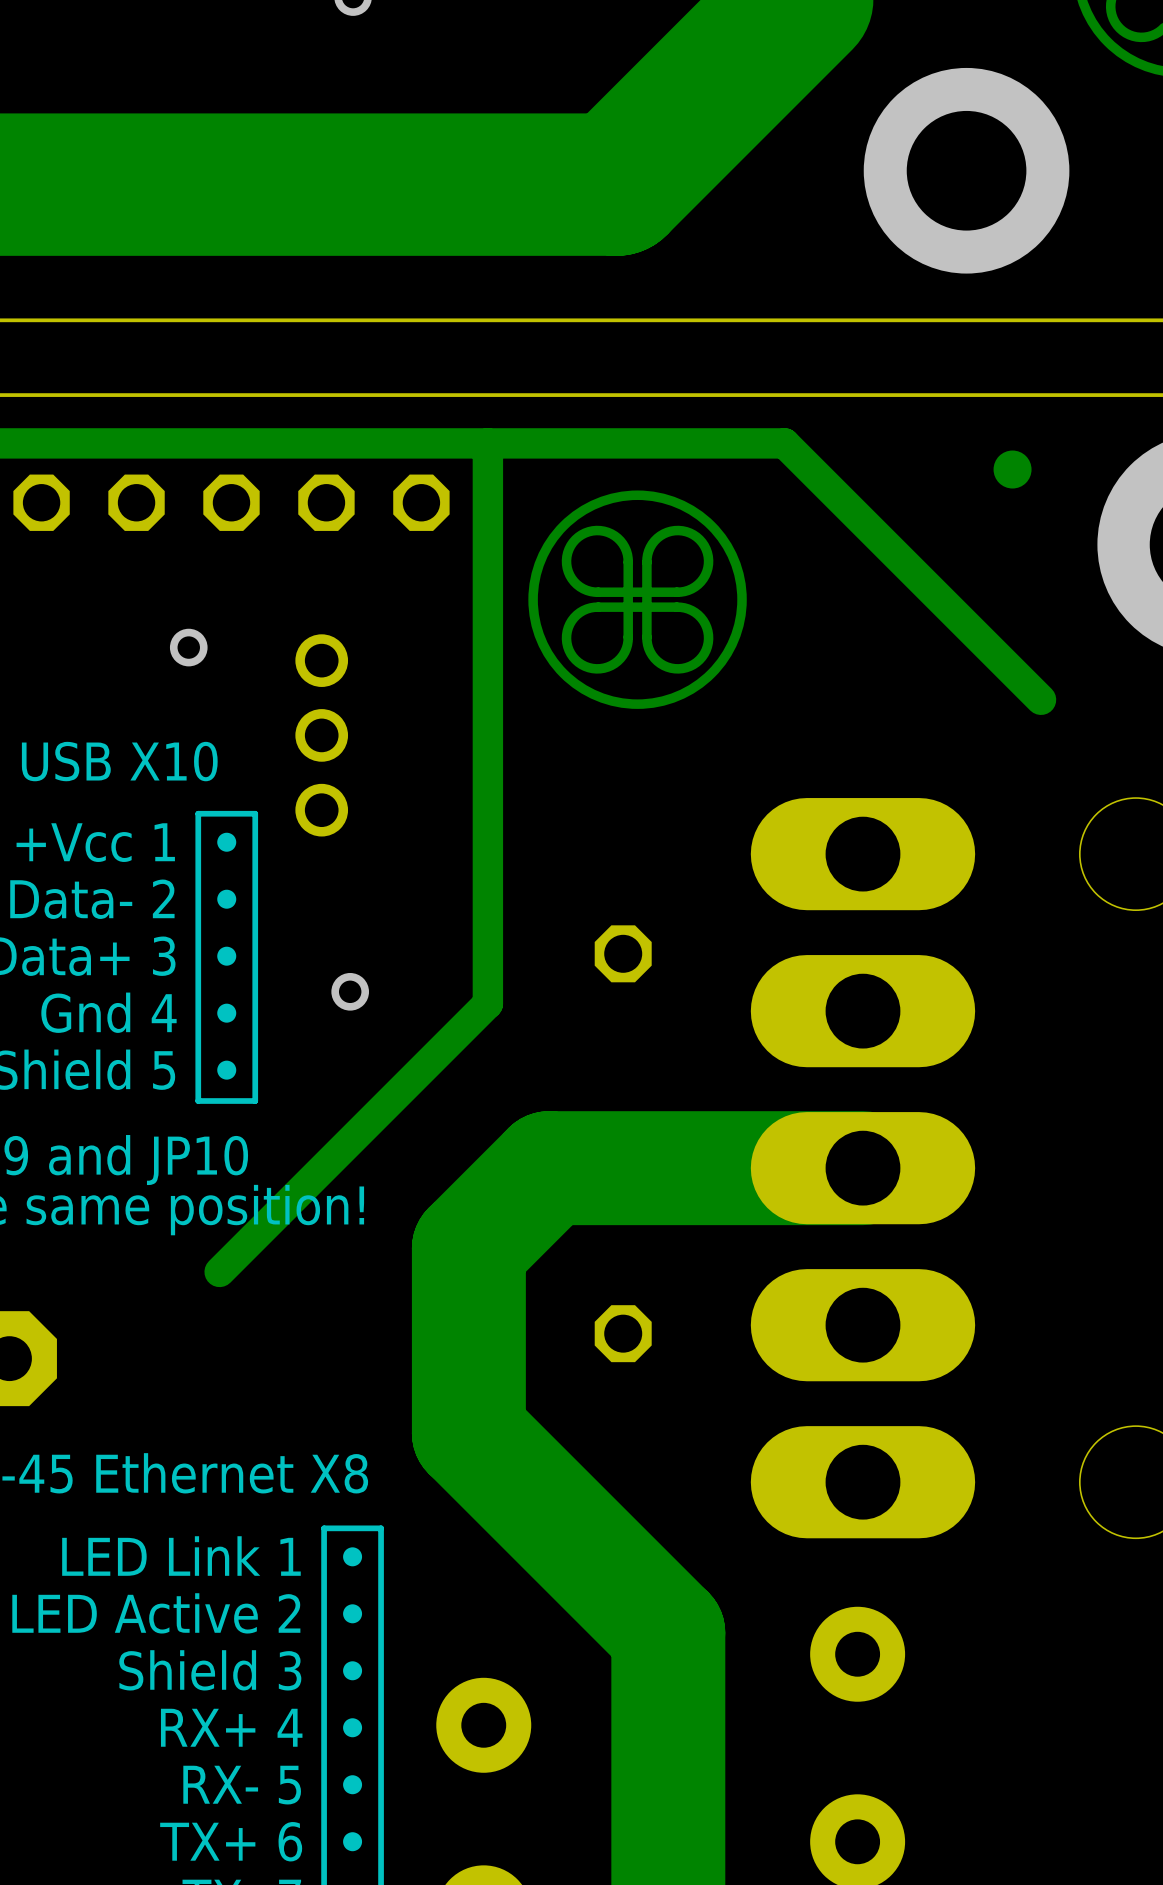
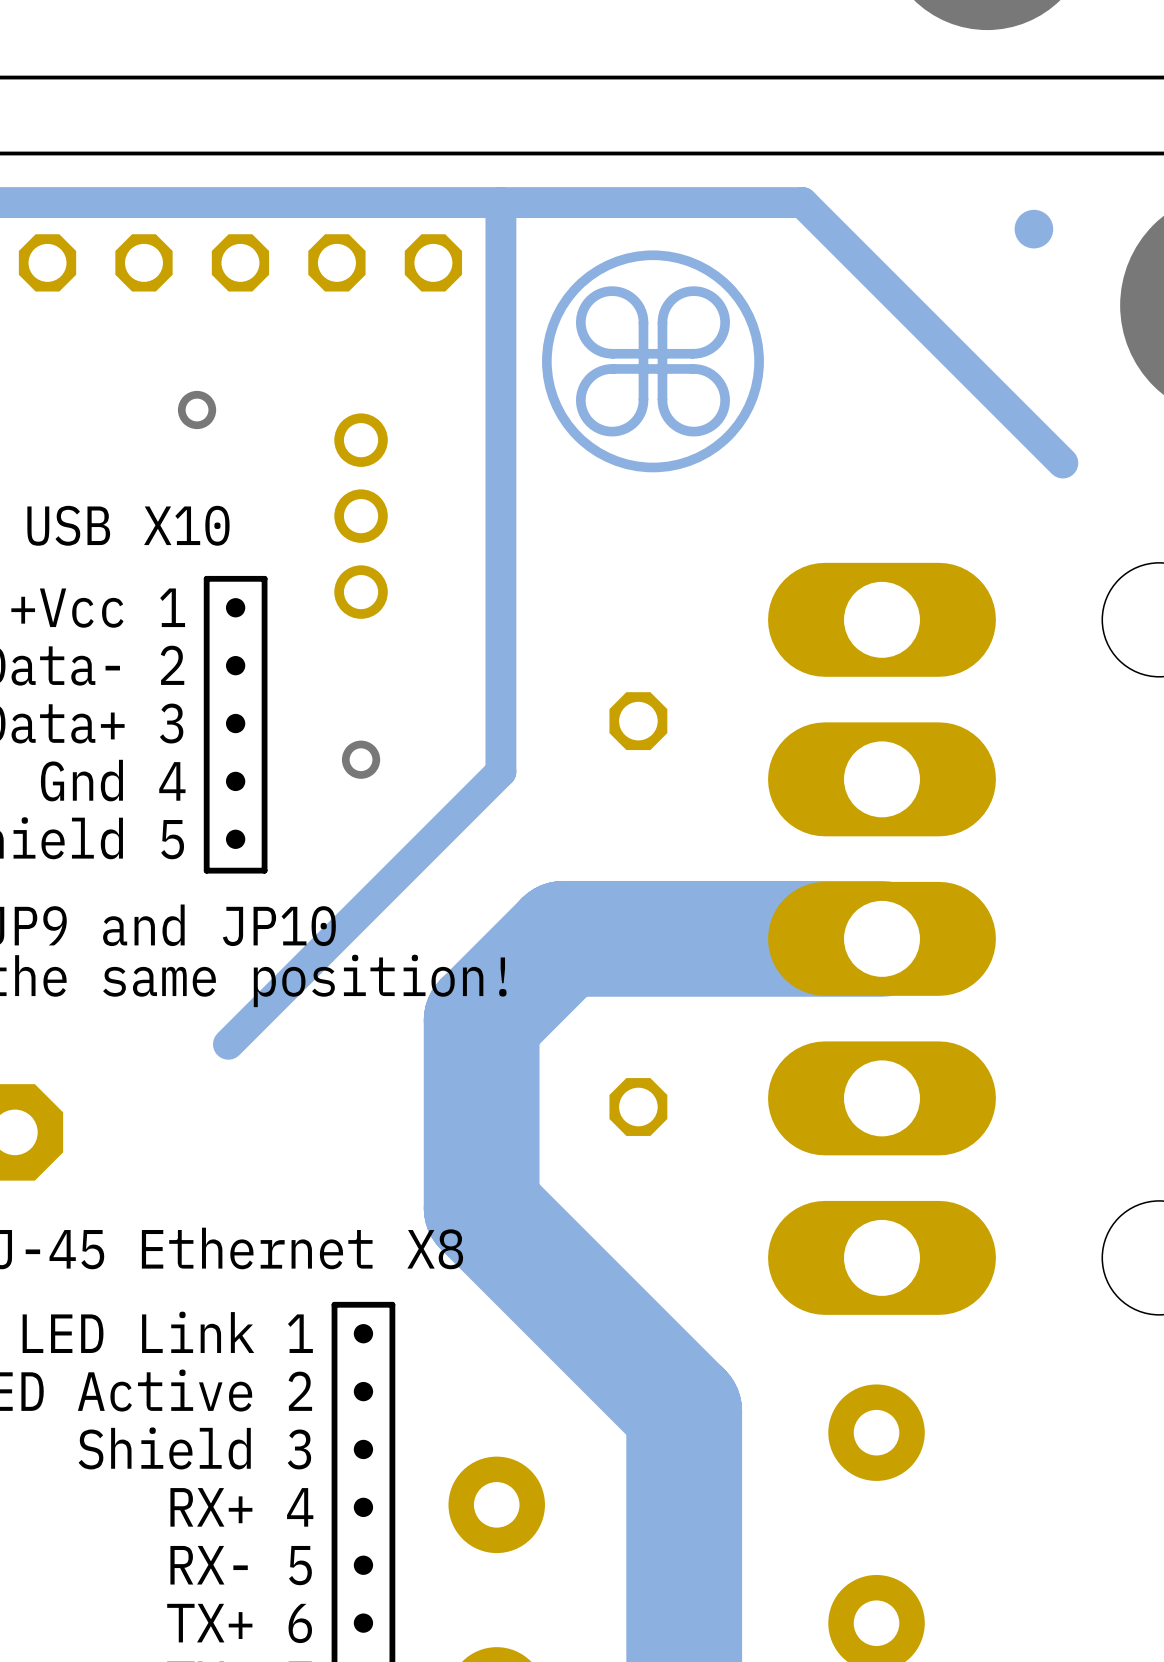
part position: (321, 735) -> (361, 516)

